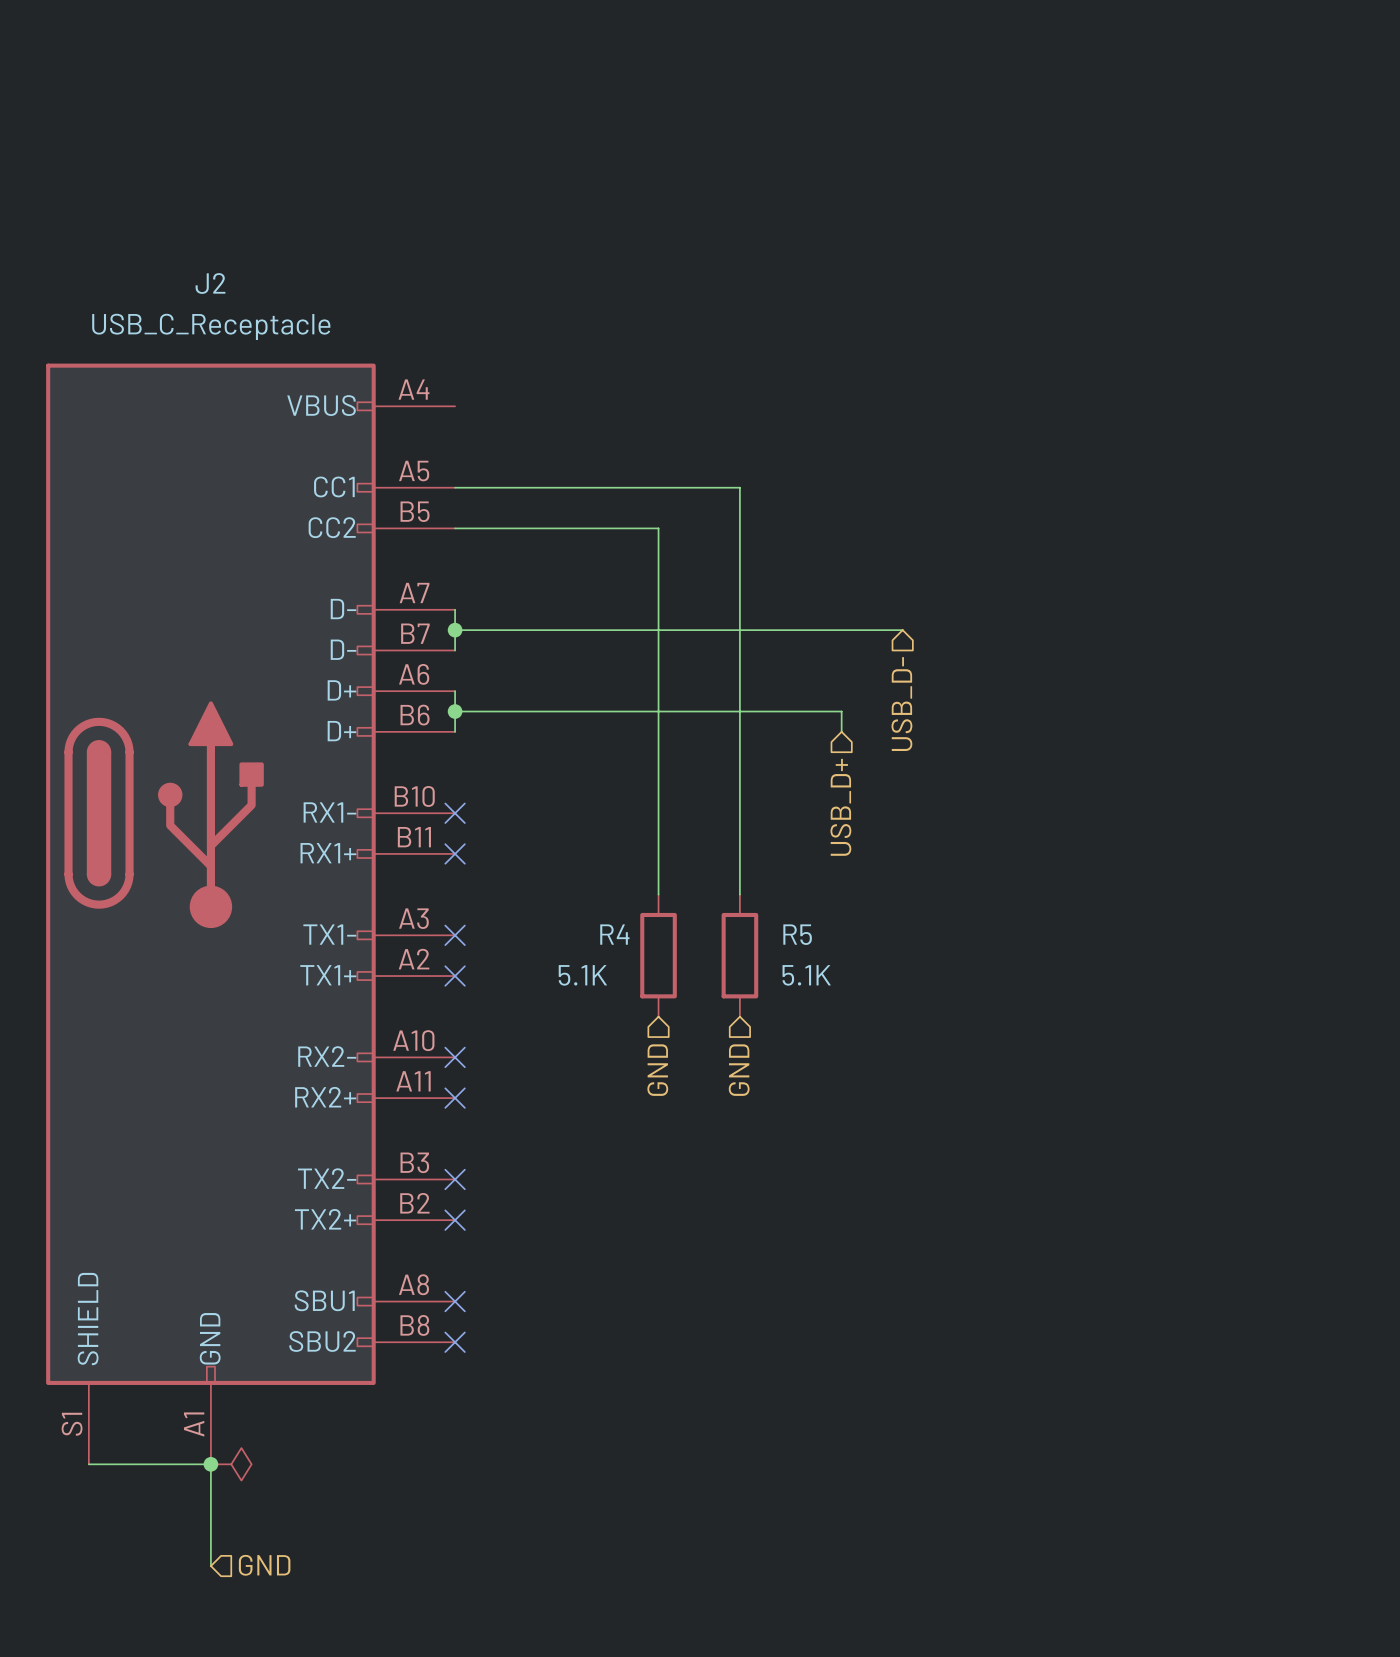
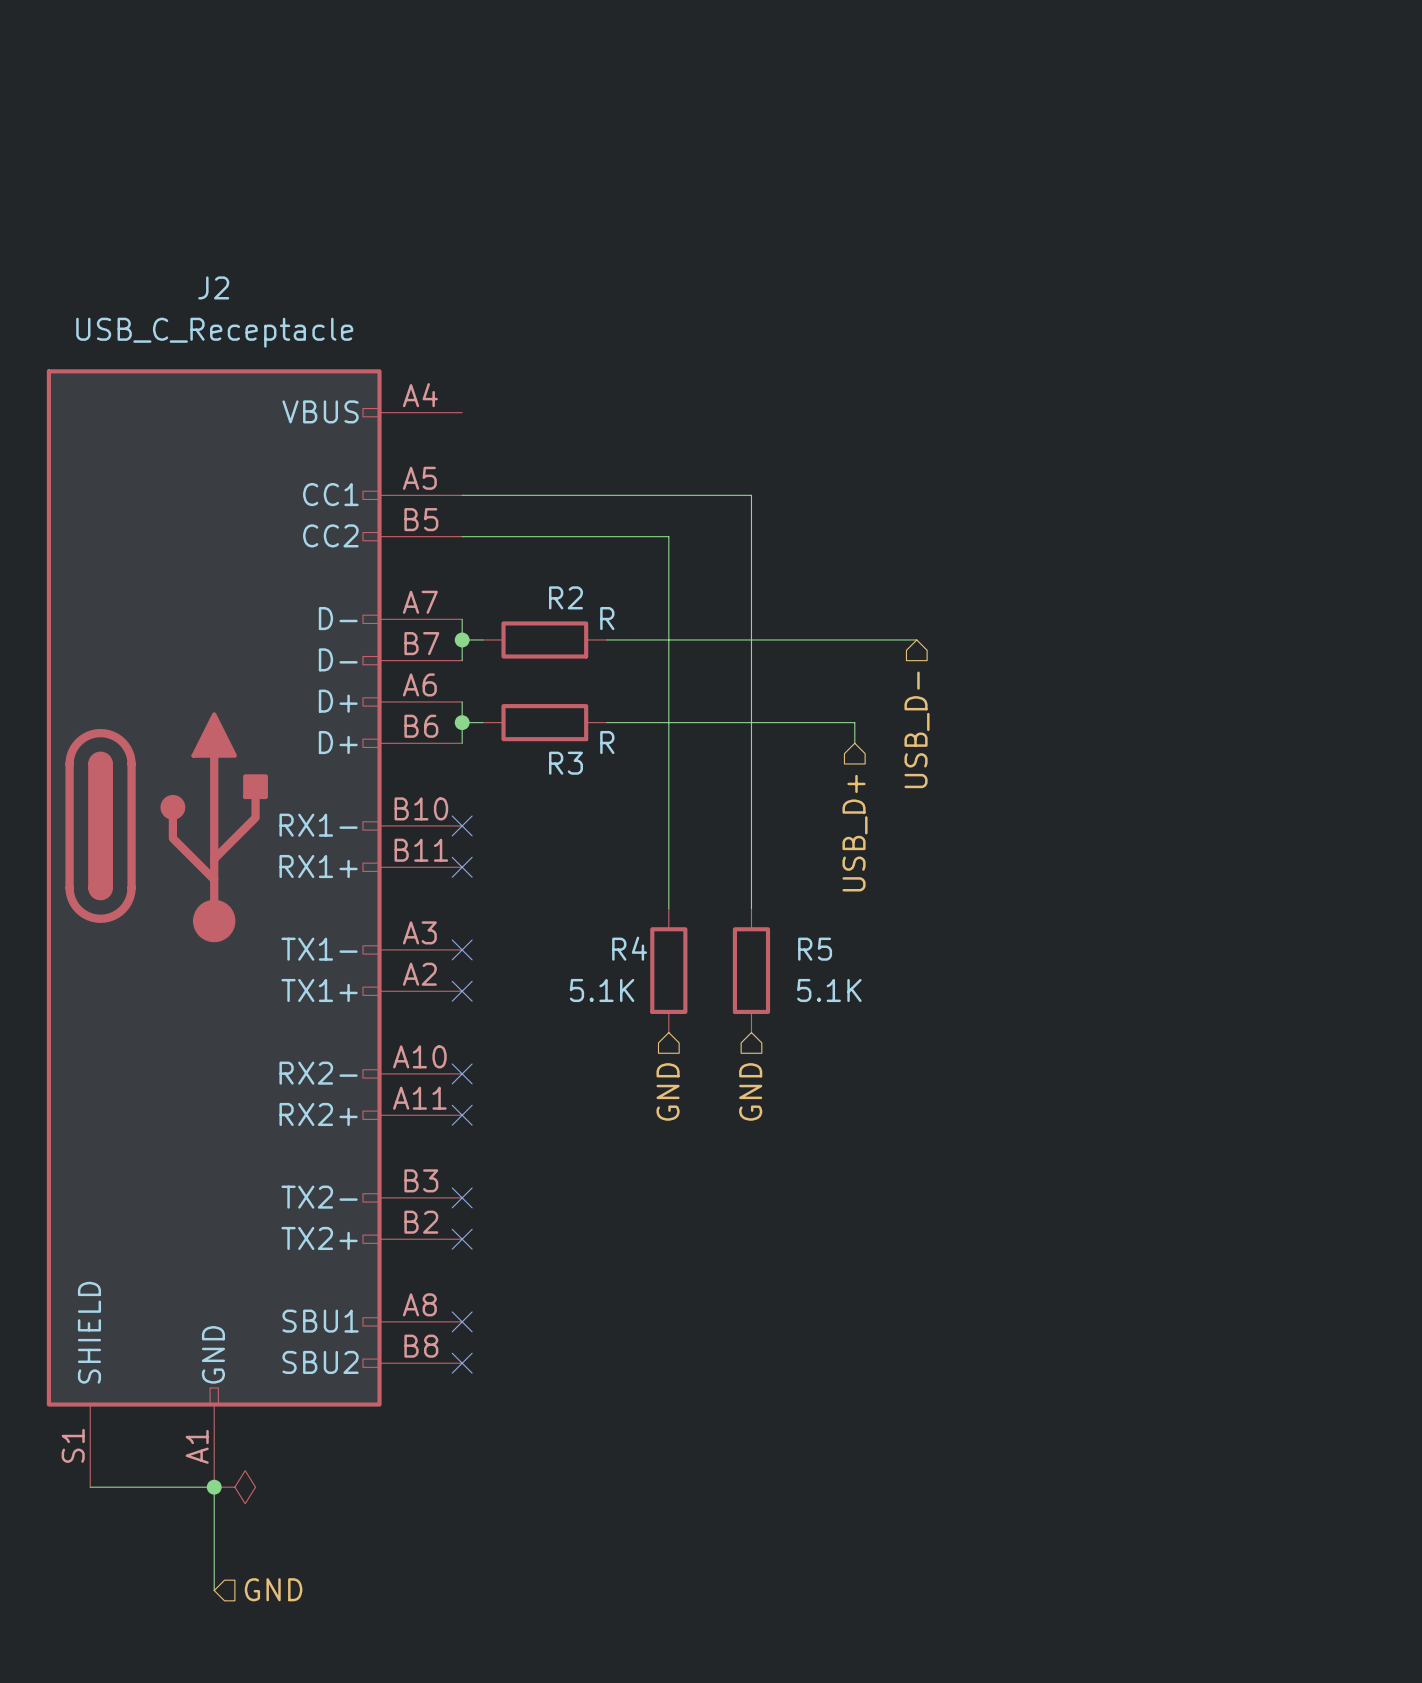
wire: (475, 630) (597, 630) -> none
R2: none -> R (544, 639)
wire: (475, 711) (597, 711) -> none
R3: none -> R (544, 722)

